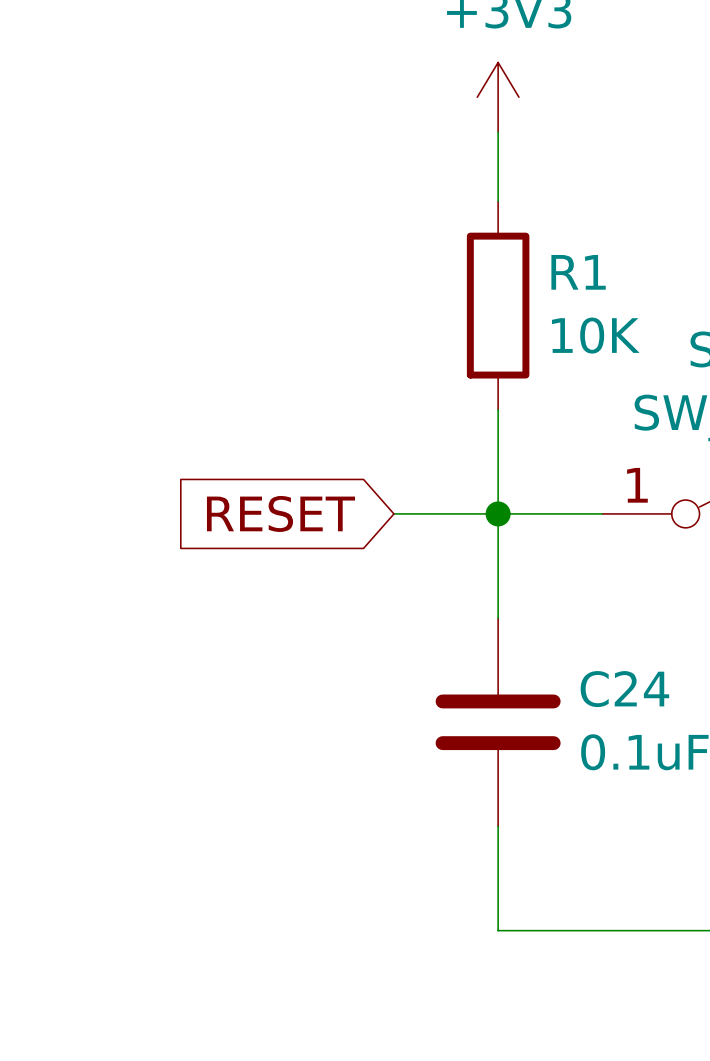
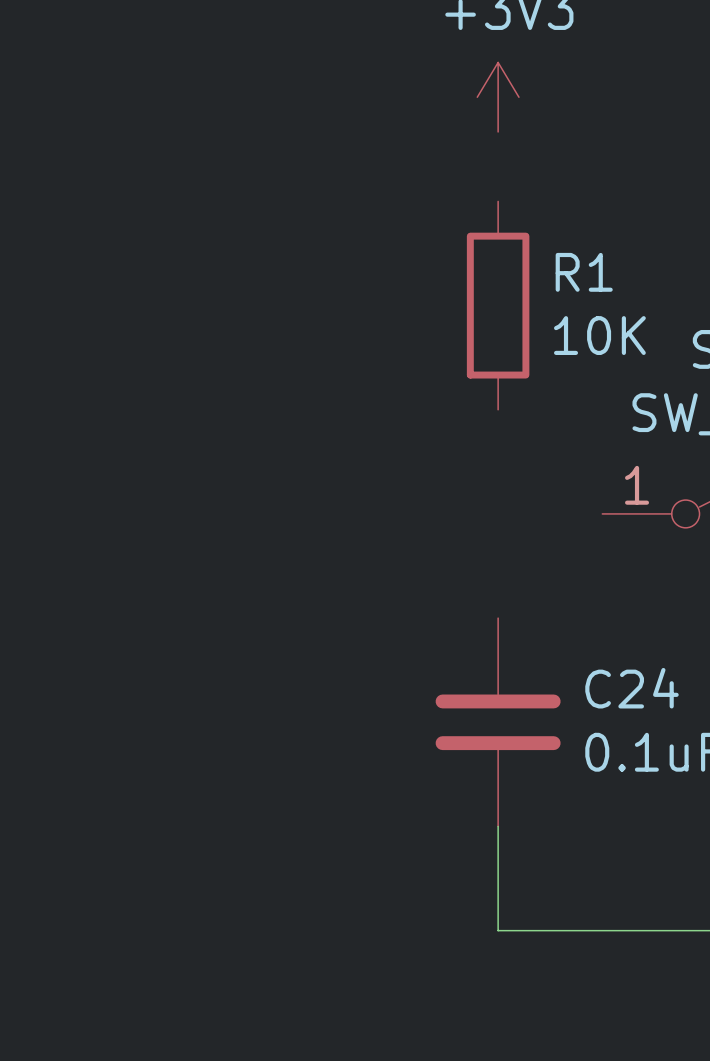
wire: (498, 131) (498, 201) -> none
wire: (498, 409) (498, 618) -> none
global label: RESET (280, 513) -> none
wire: (393, 513) (602, 513) -> none
junction: (498, 513) -> none

